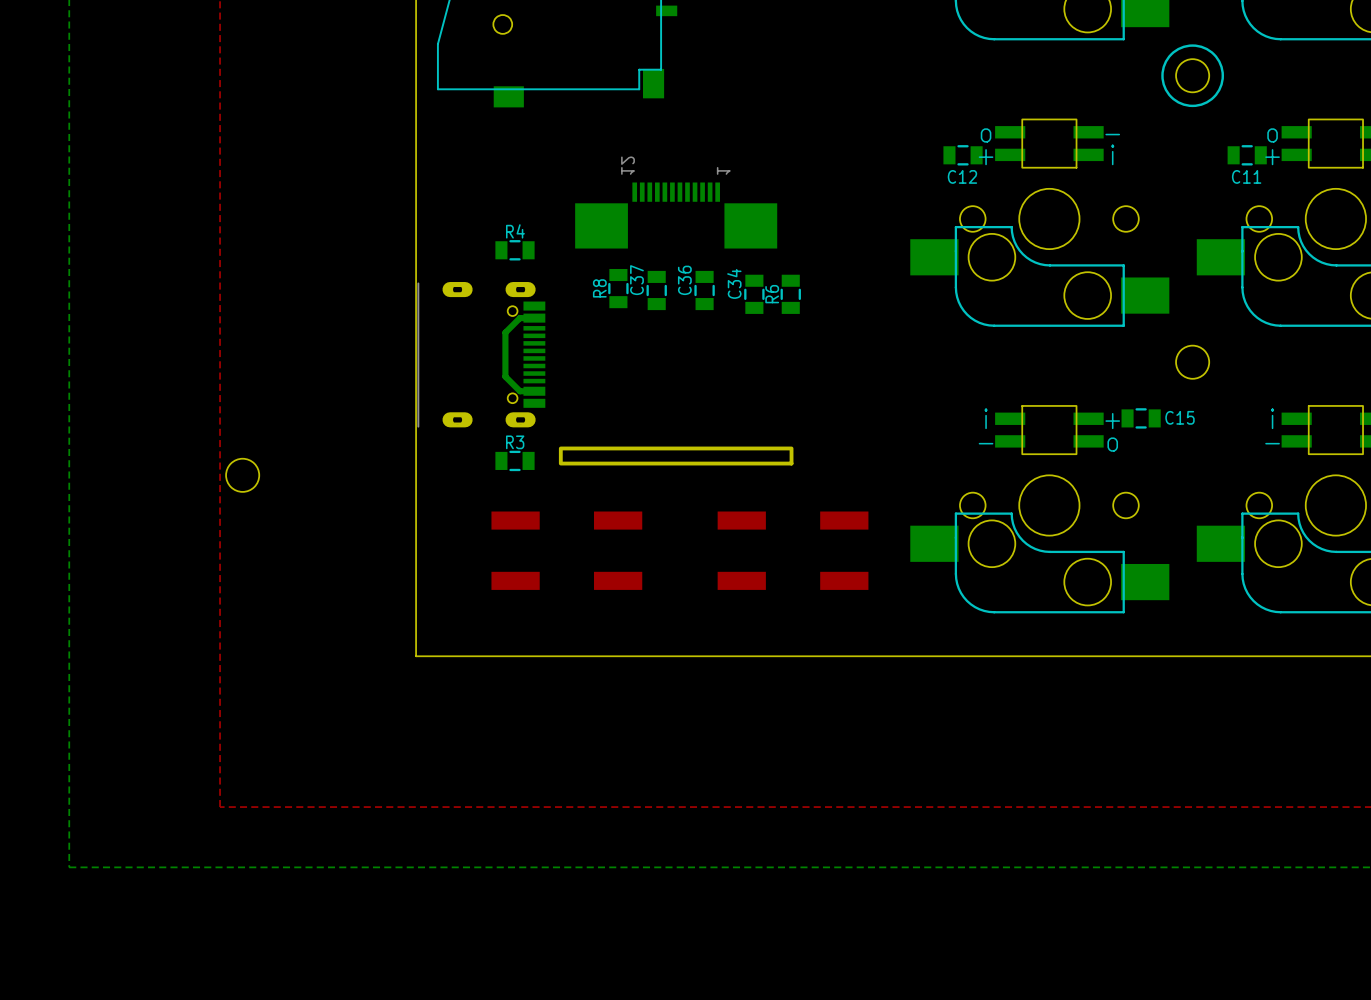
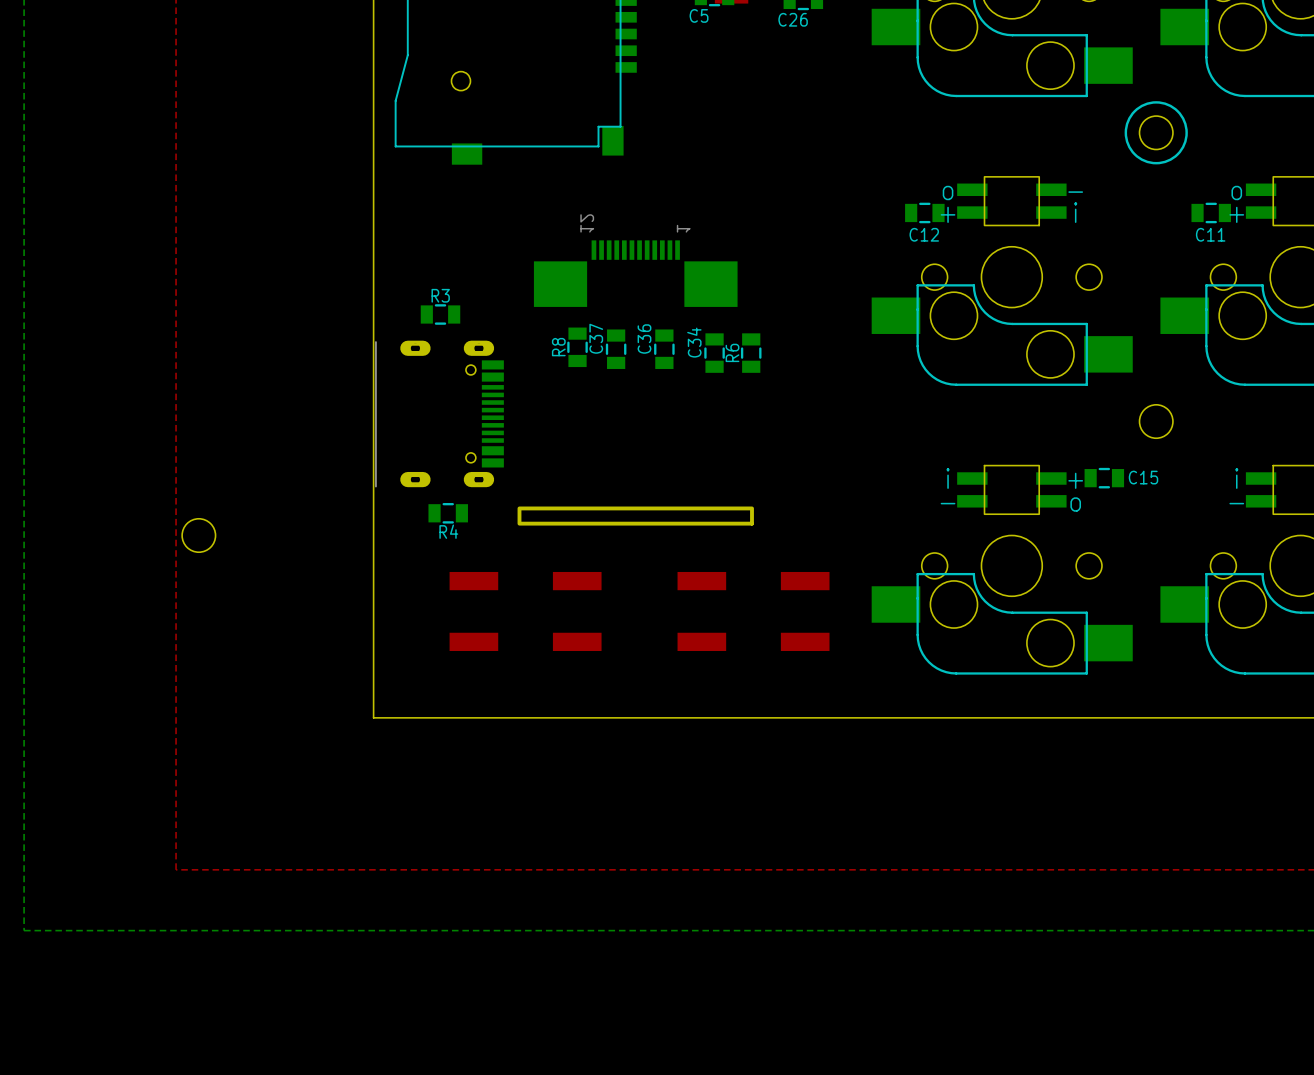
R4 name position: R4 (515, 231) -> R4 (448, 531)
R4 position: (515, 250) -> (448, 513)
bottom track: (534, 318) (519, 318) (505, 332) (505, 376) (520, 391) (534, 391) -> none
R3 position: (515, 460) -> (440, 314)

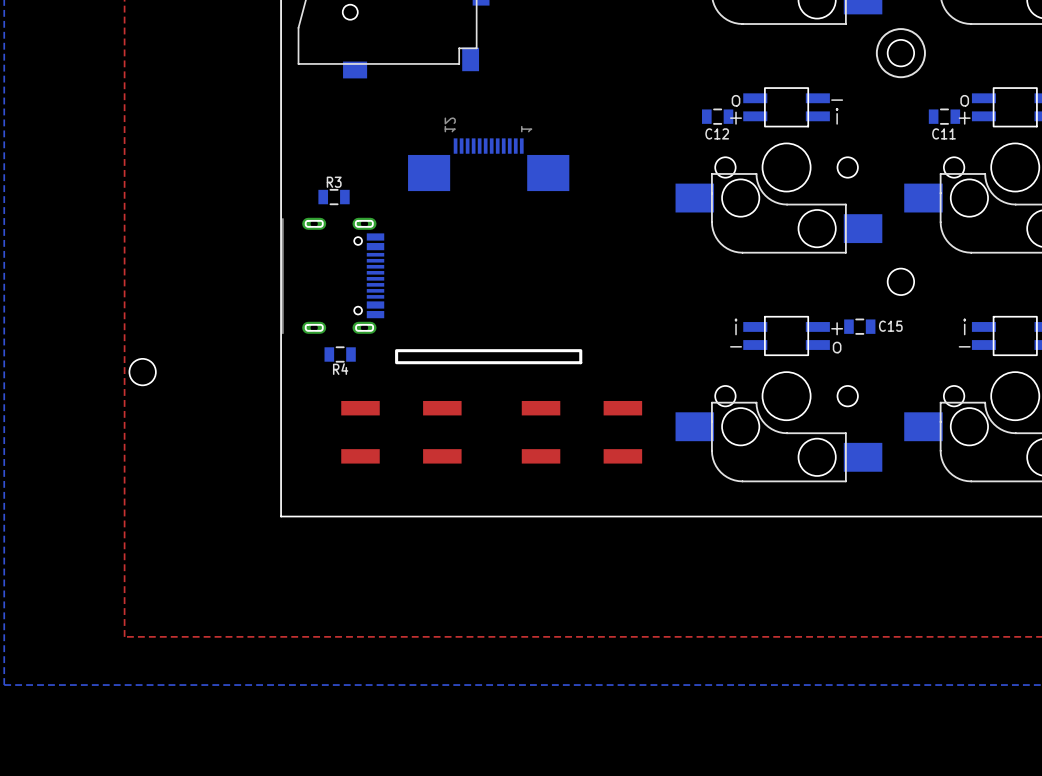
R8: (577, 347) -> none
C37: (616, 349) -> none
C36: (664, 349) -> none
C34: (714, 353) -> none
R6: (751, 353) -> none

